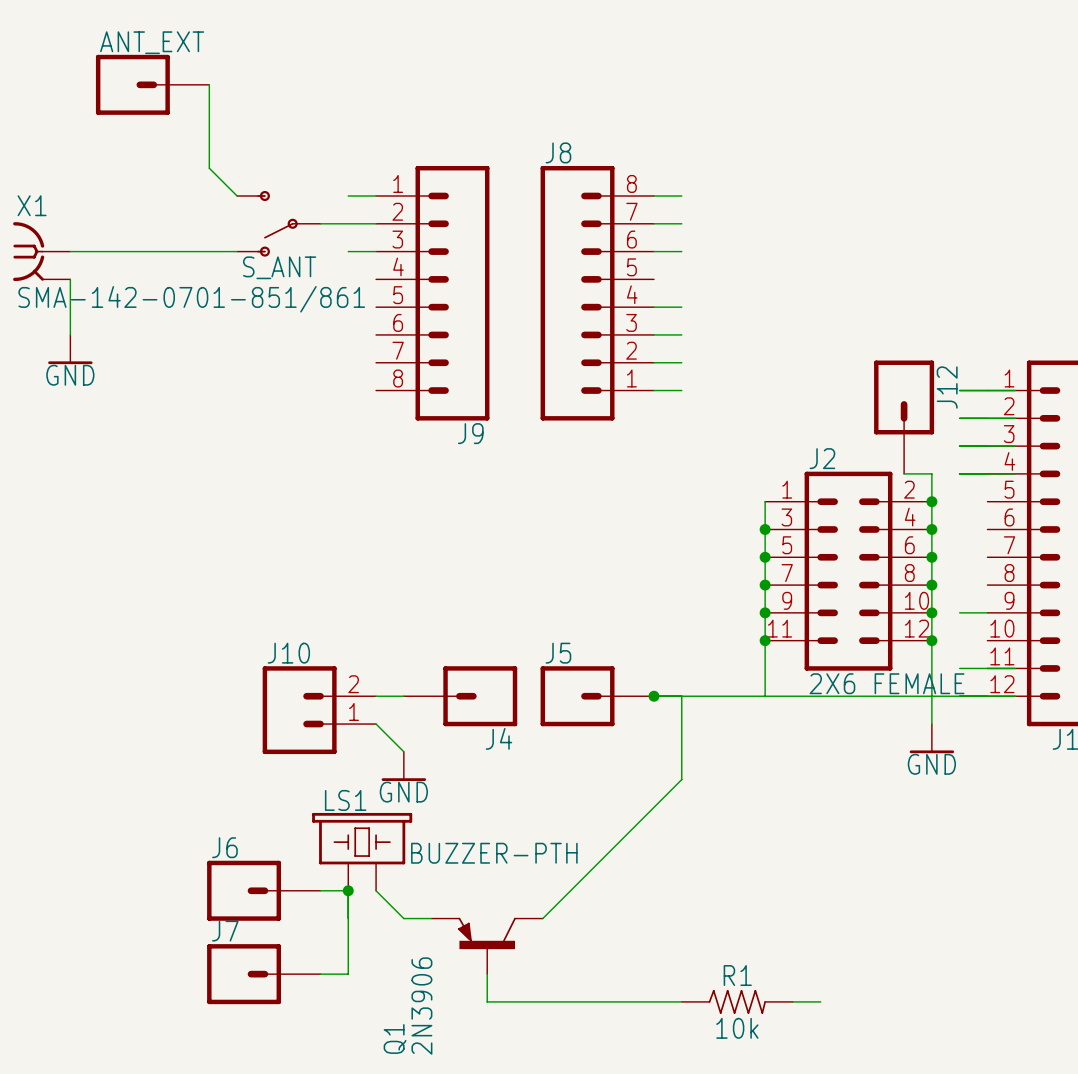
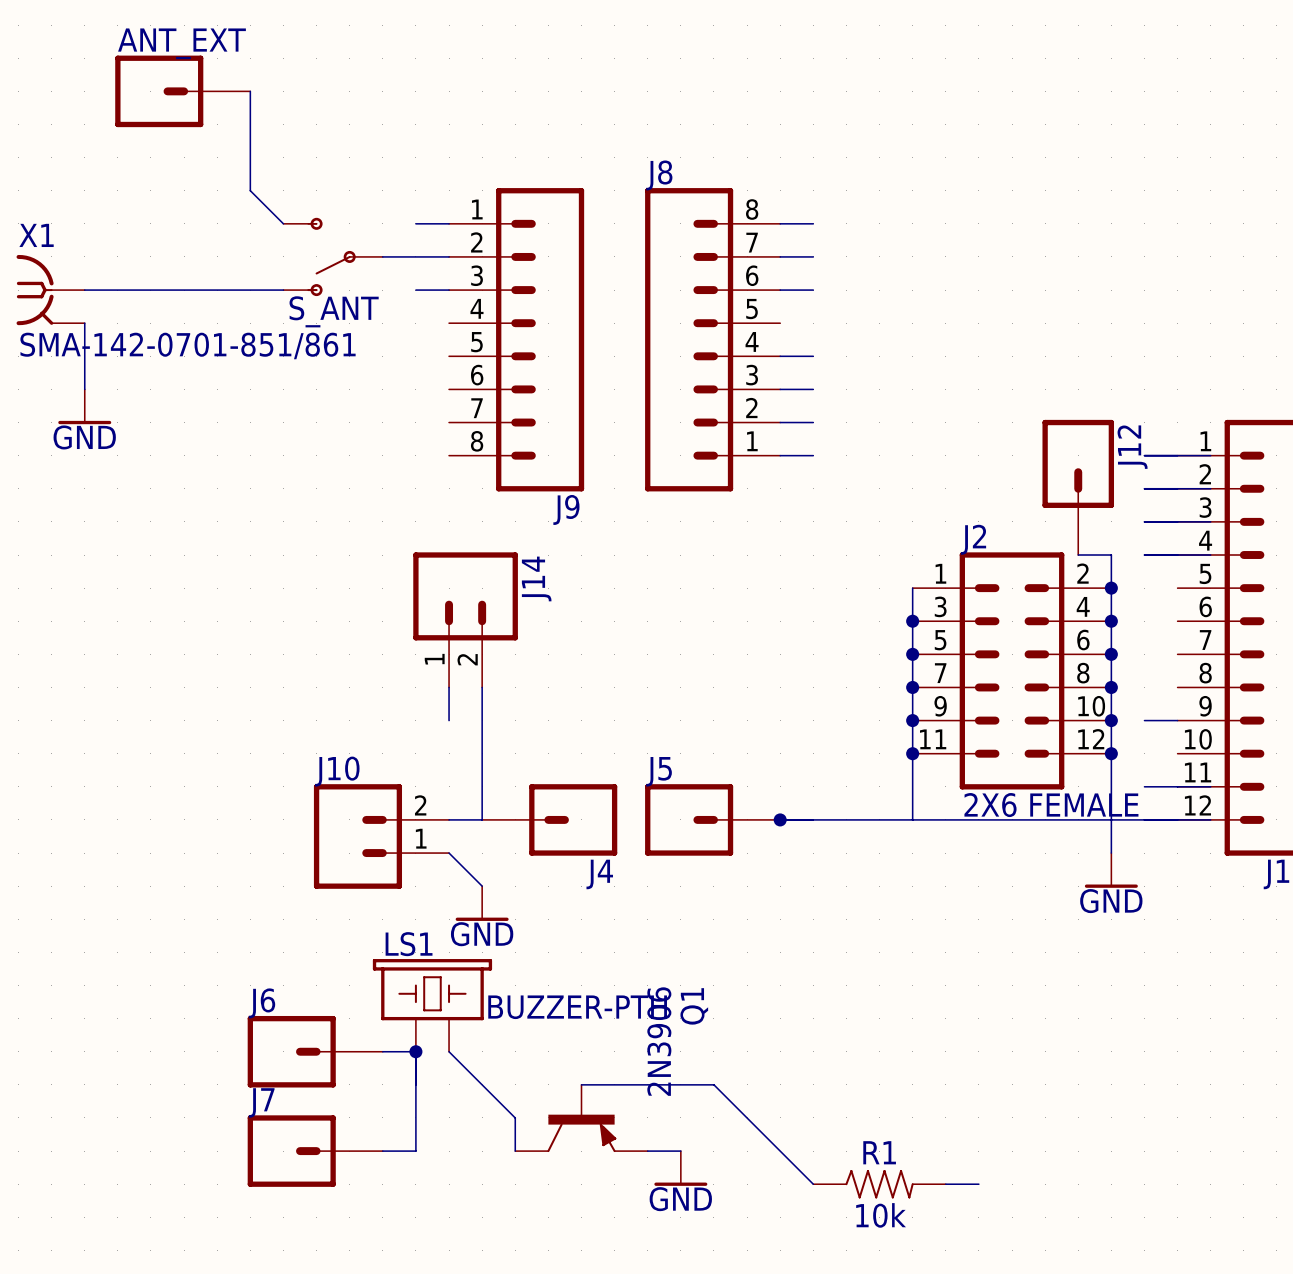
J14: none -> (465, 619)
wire: none -> (449, 687) (449, 720)
wire: none -> (482, 687) (482, 819)
wire: (681, 696) (681, 779) (542, 918) -> none
wire: (403, 918) (431, 918) -> (482, 1084) (515, 1117) (515, 1151)
Q1 rotation: 0° (486, 933) -> 180° (581, 1133)
wire: (487, 974) (487, 1001) (681, 1001) -> (581, 1084) (713, 1084) (813, 1184)
wire: none -> (647, 1151) (680, 1151)
power symbol: none -> GND (680, 1168)

